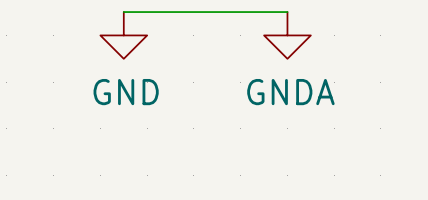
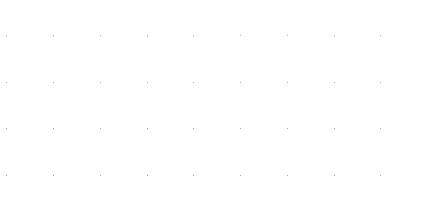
wire: (123, 12) (287, 12) -> none
power symbol: GND (123, 35) -> none
power symbol: GNDA (287, 35) -> none

